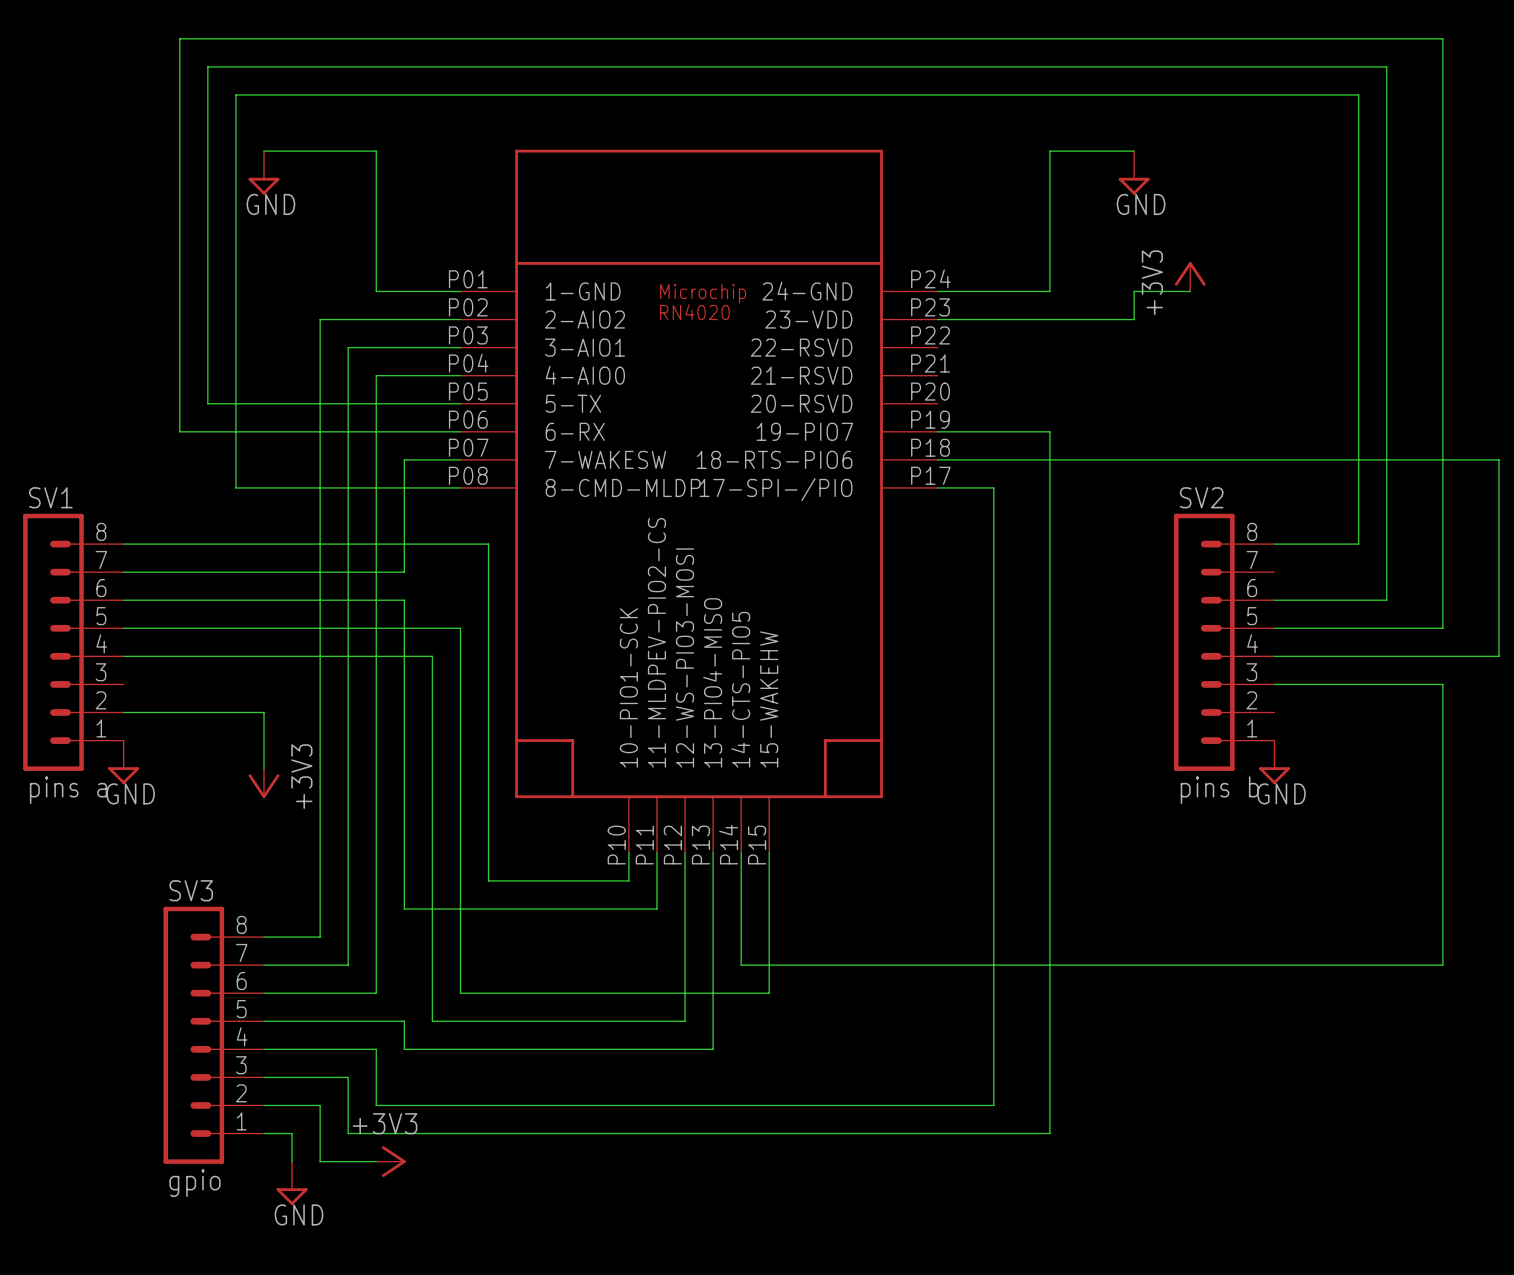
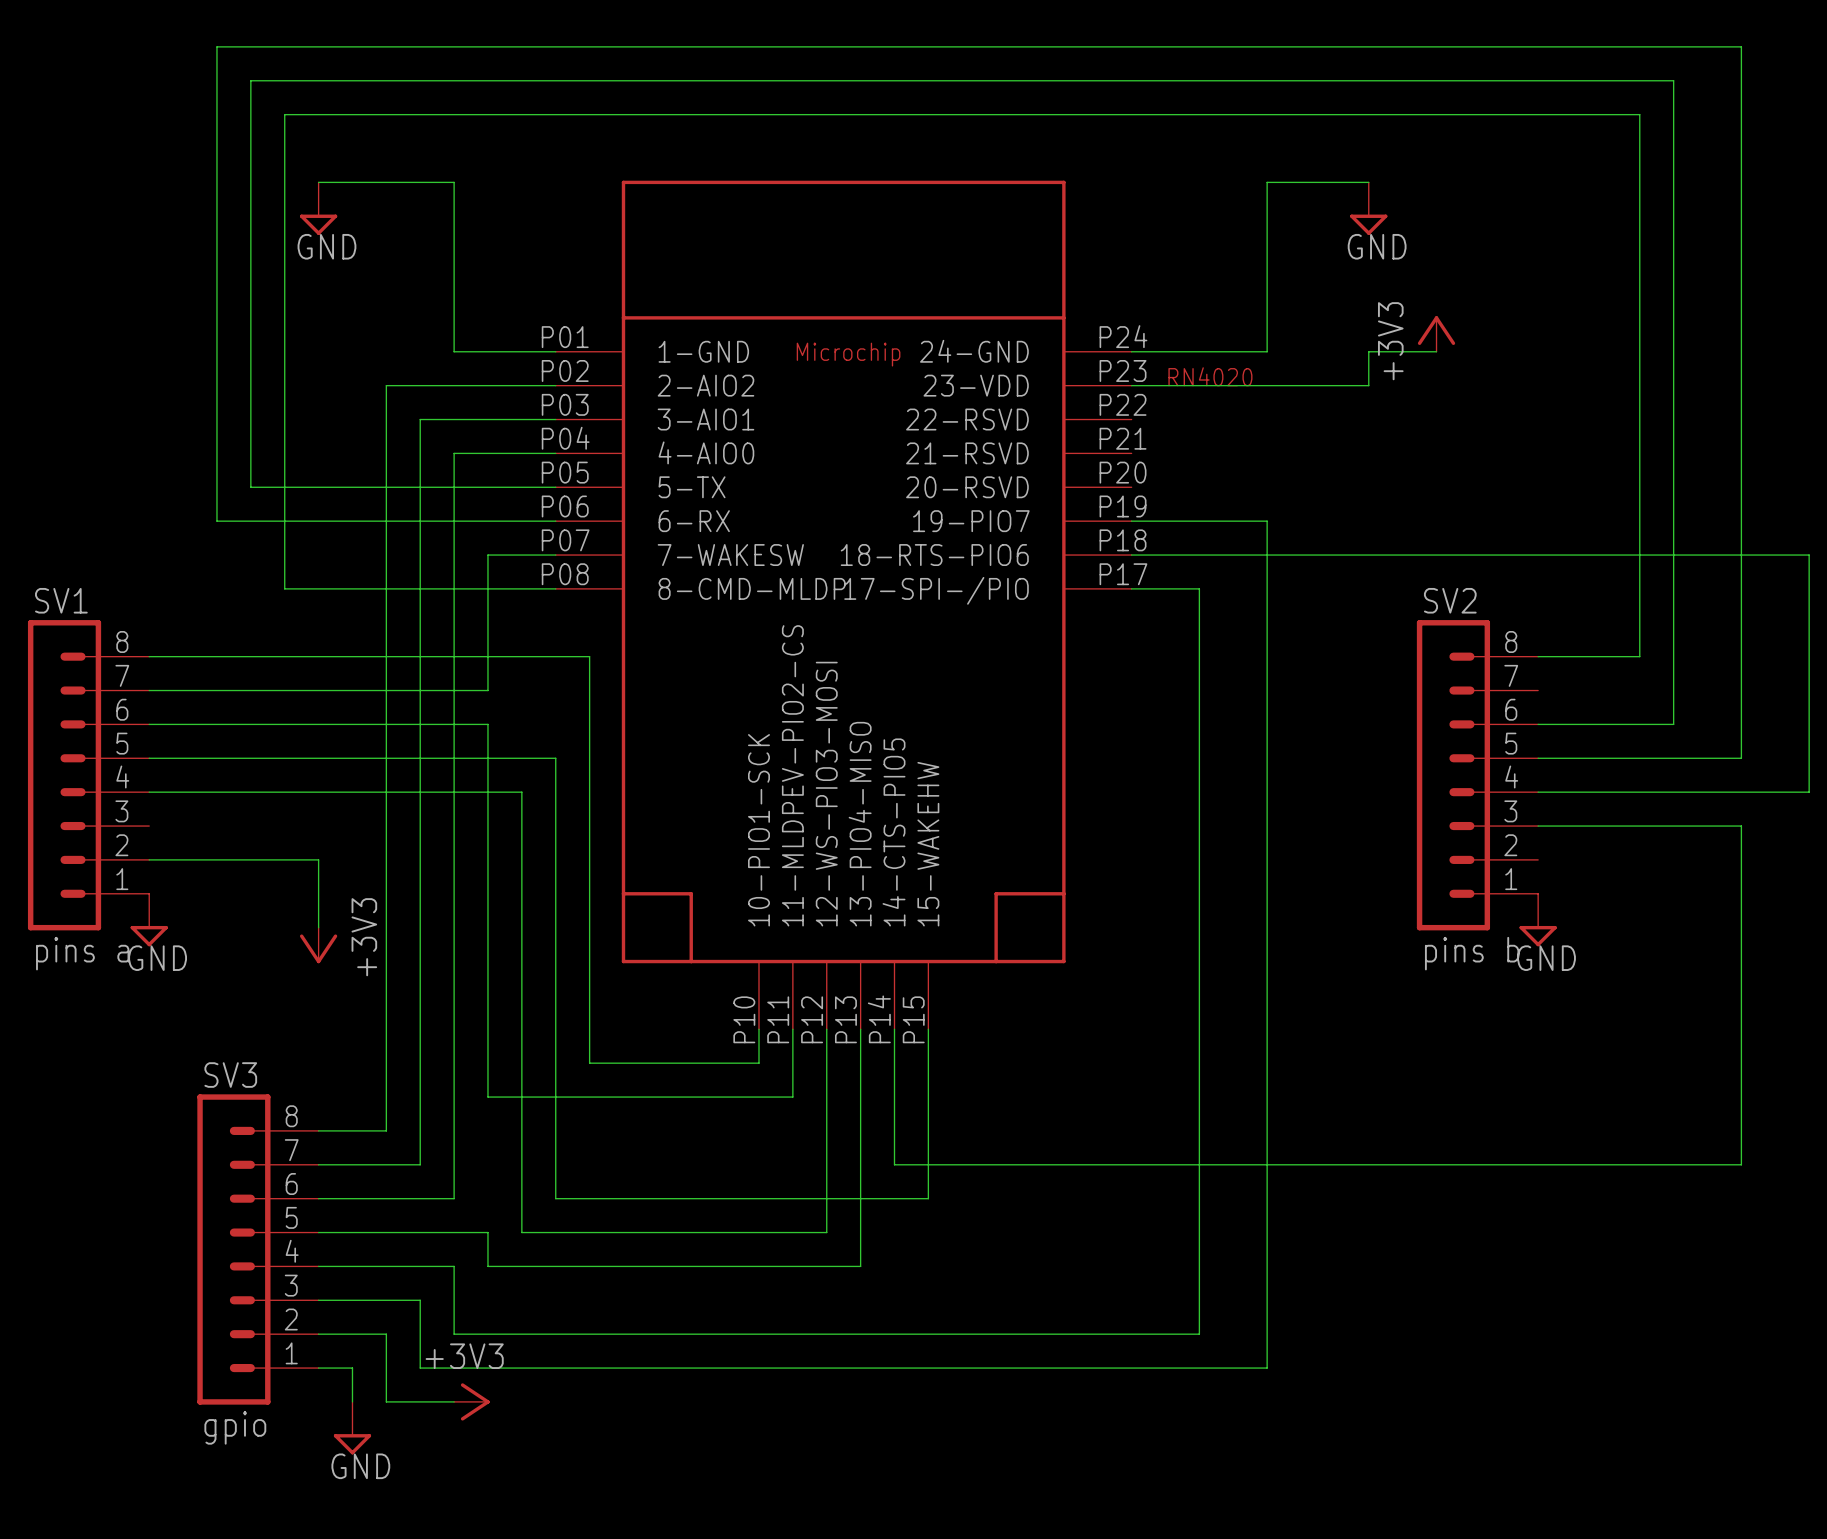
part symbol: [460, 149, 938, 853] -> [555, 180, 1132, 1030]

